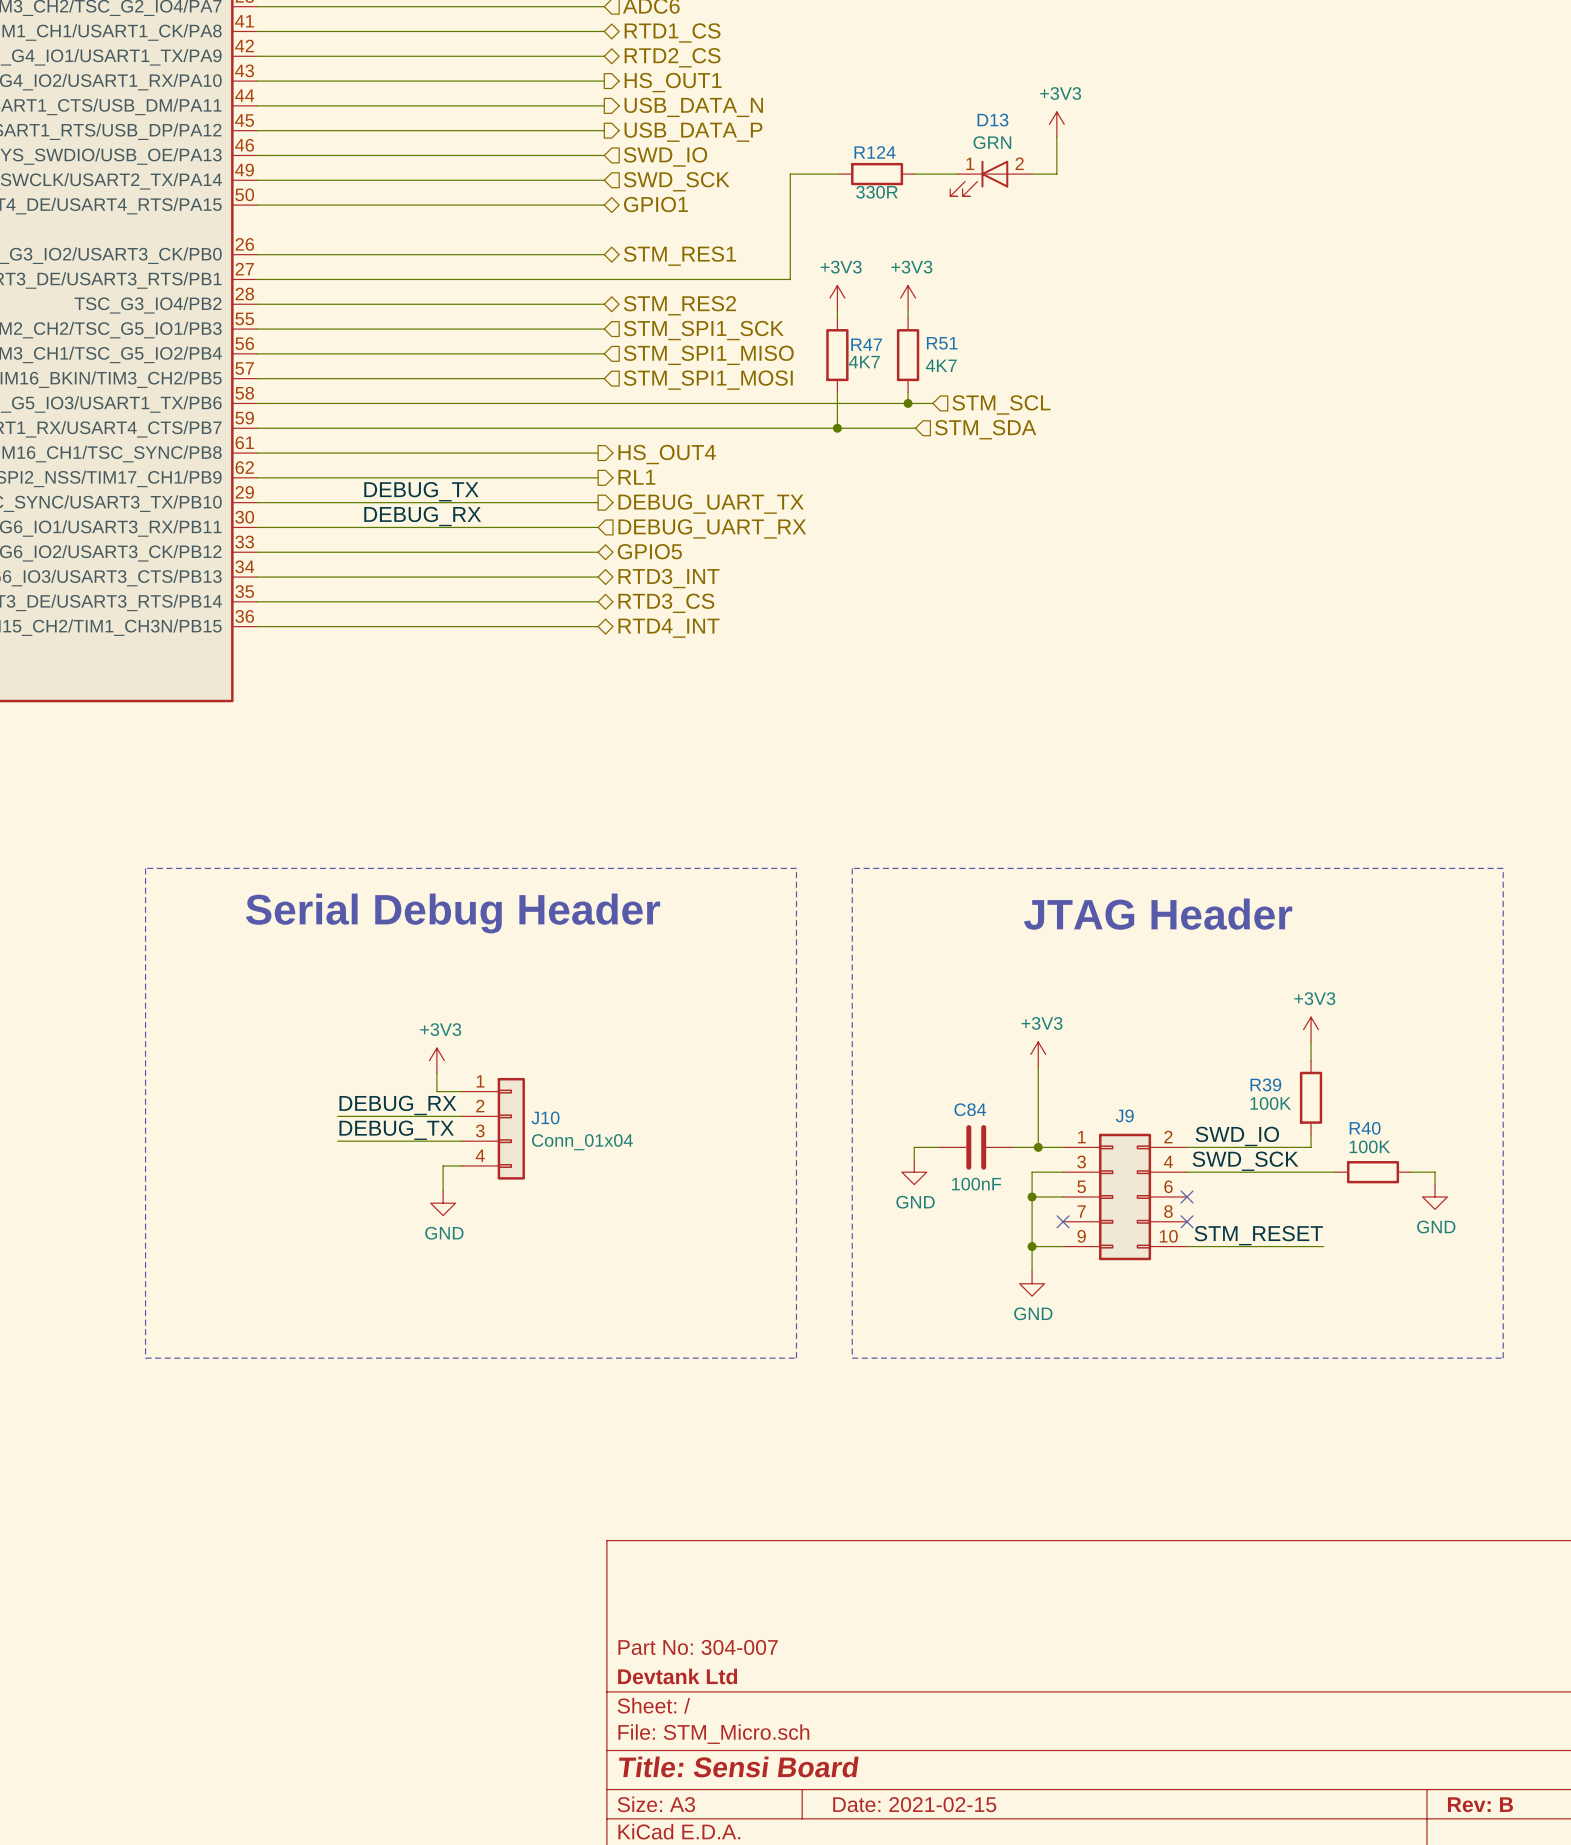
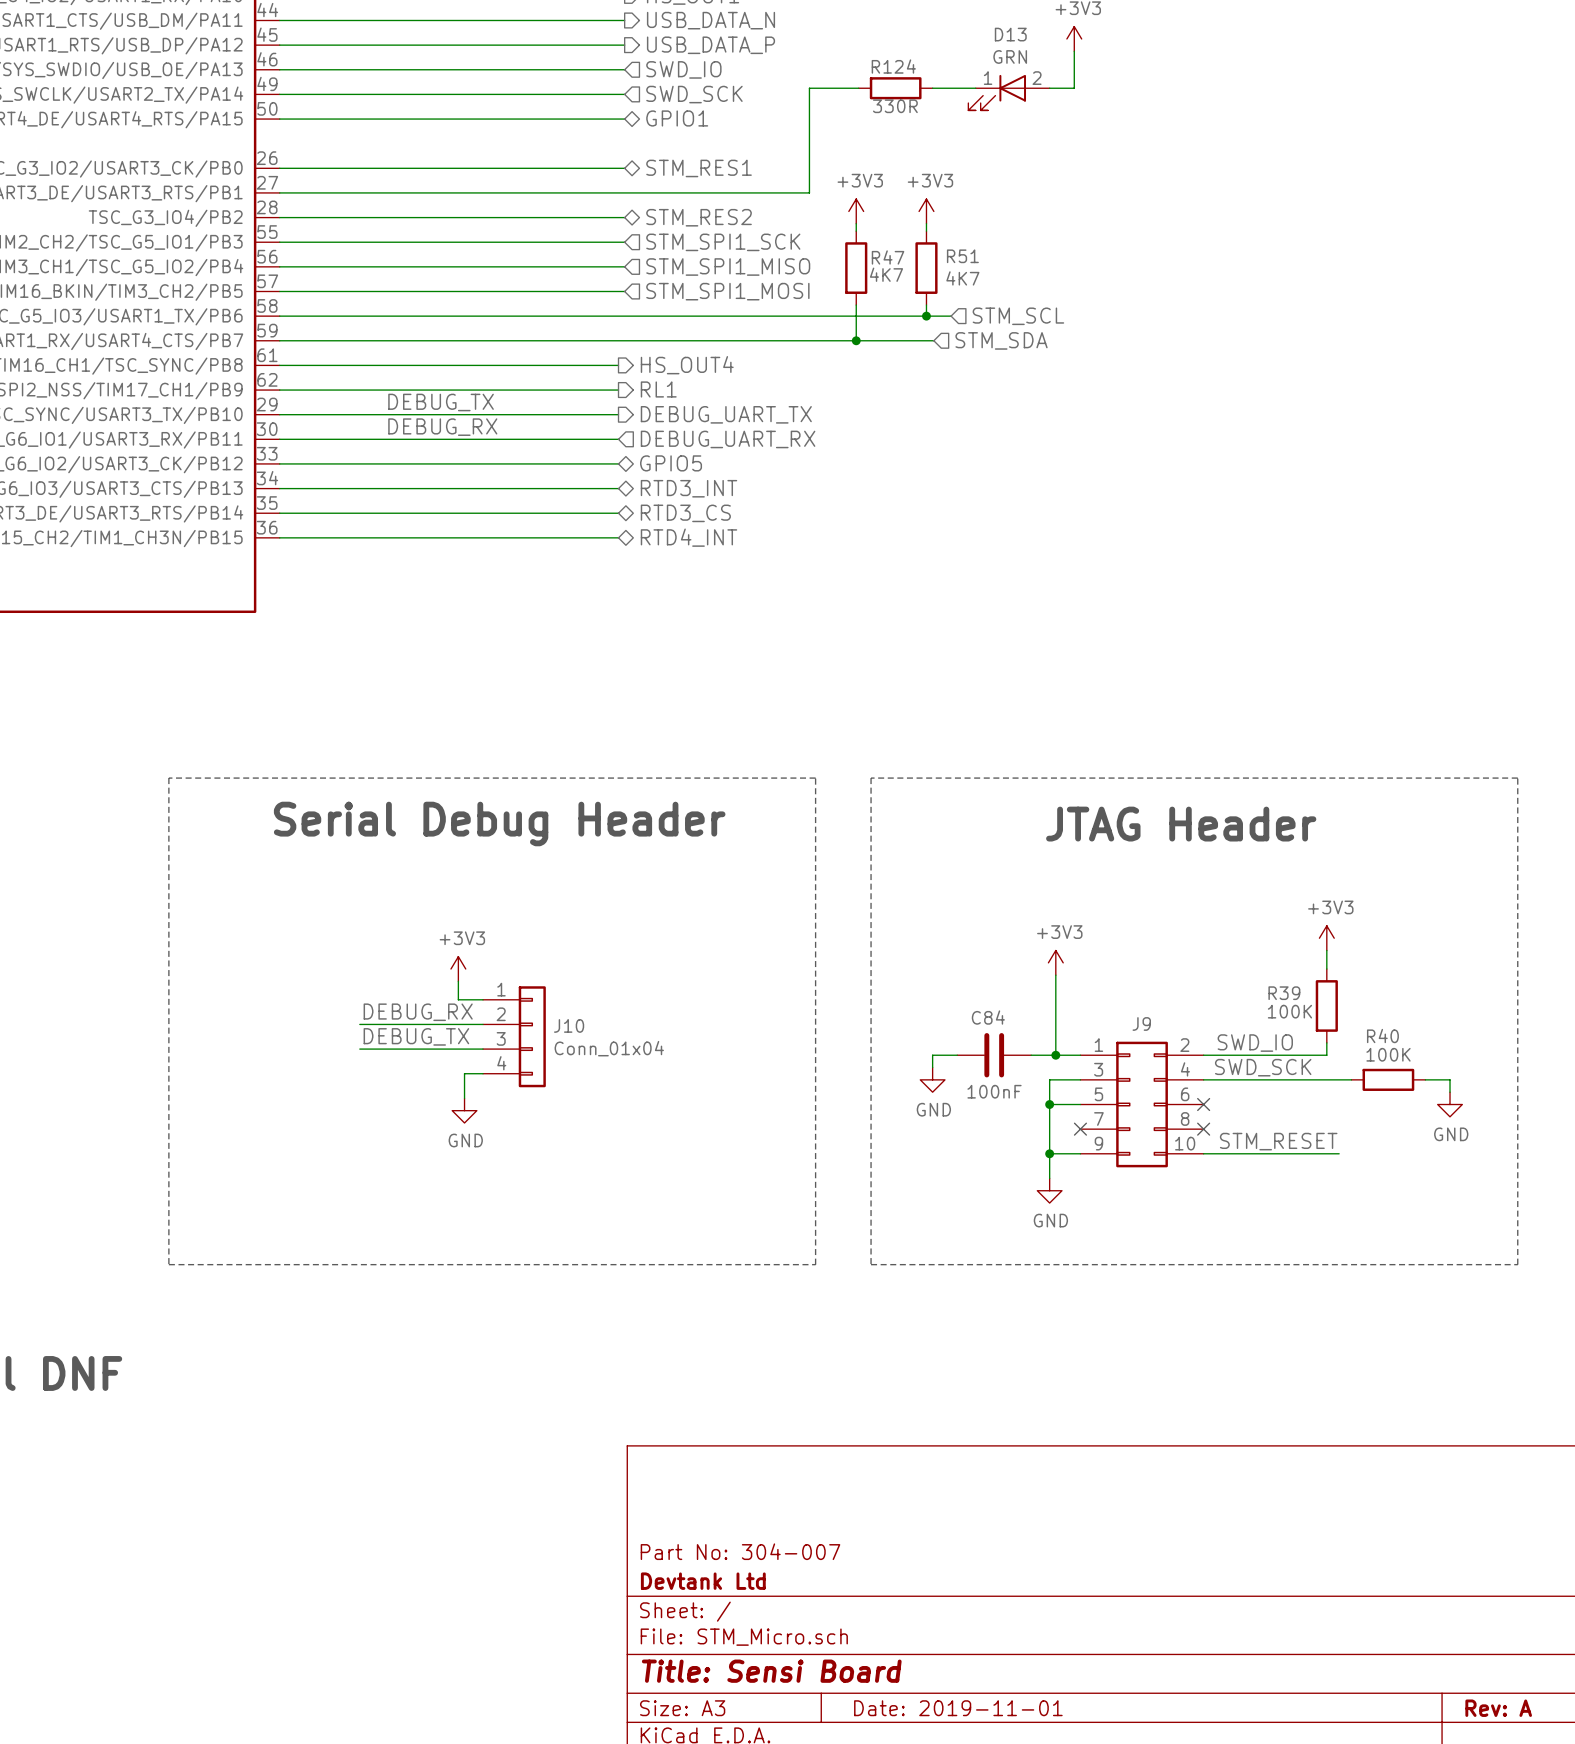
title block: Date: 2021-02-15 (914, 1804) -> Date: 2019-11-01 (958, 1708)
title block: Rev: B (1480, 1804) -> Rev: A (1498, 1708)

